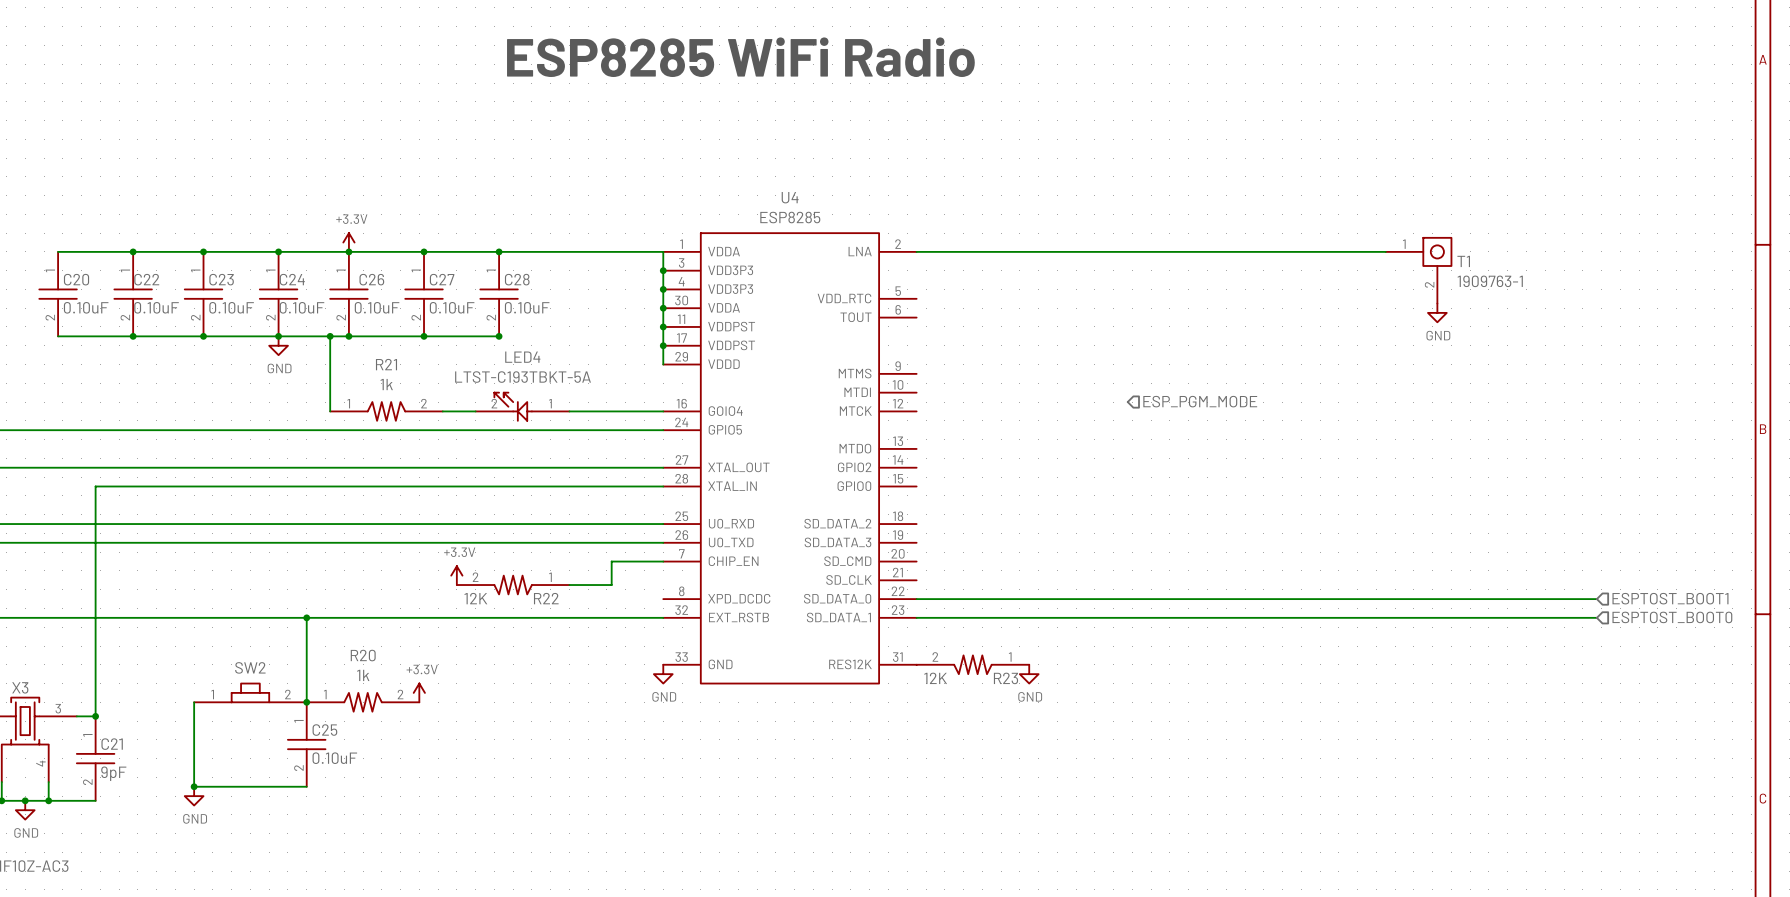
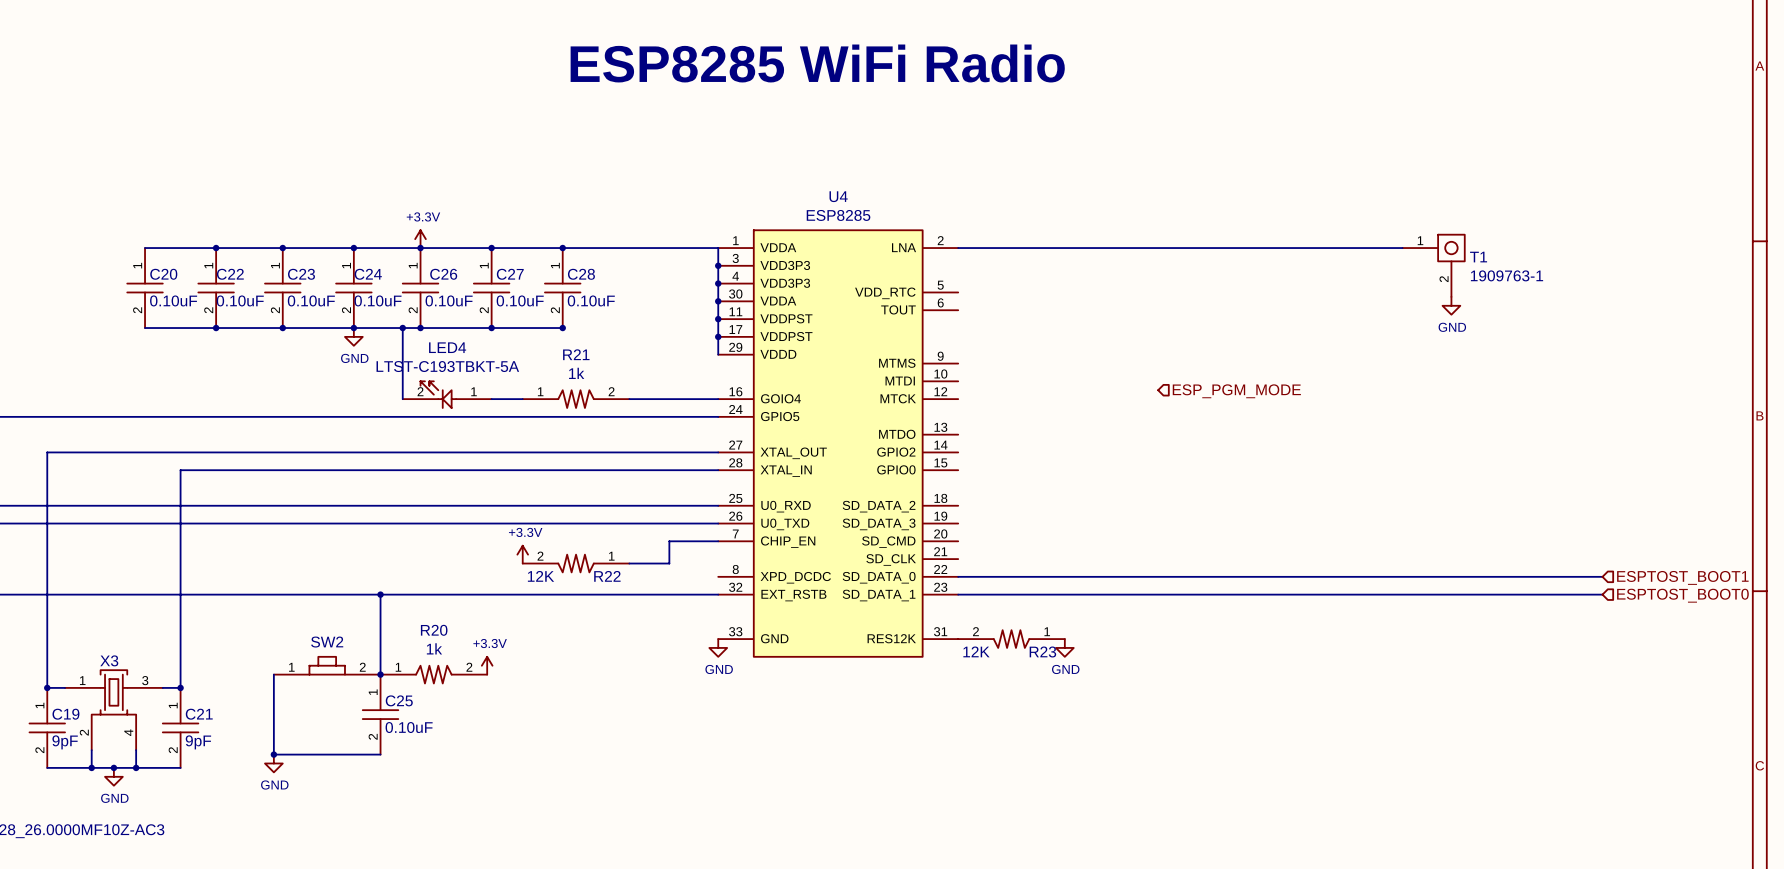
LED4 position: (522, 406) -> (447, 394)
R21 position: (386, 411) -> (576, 399)

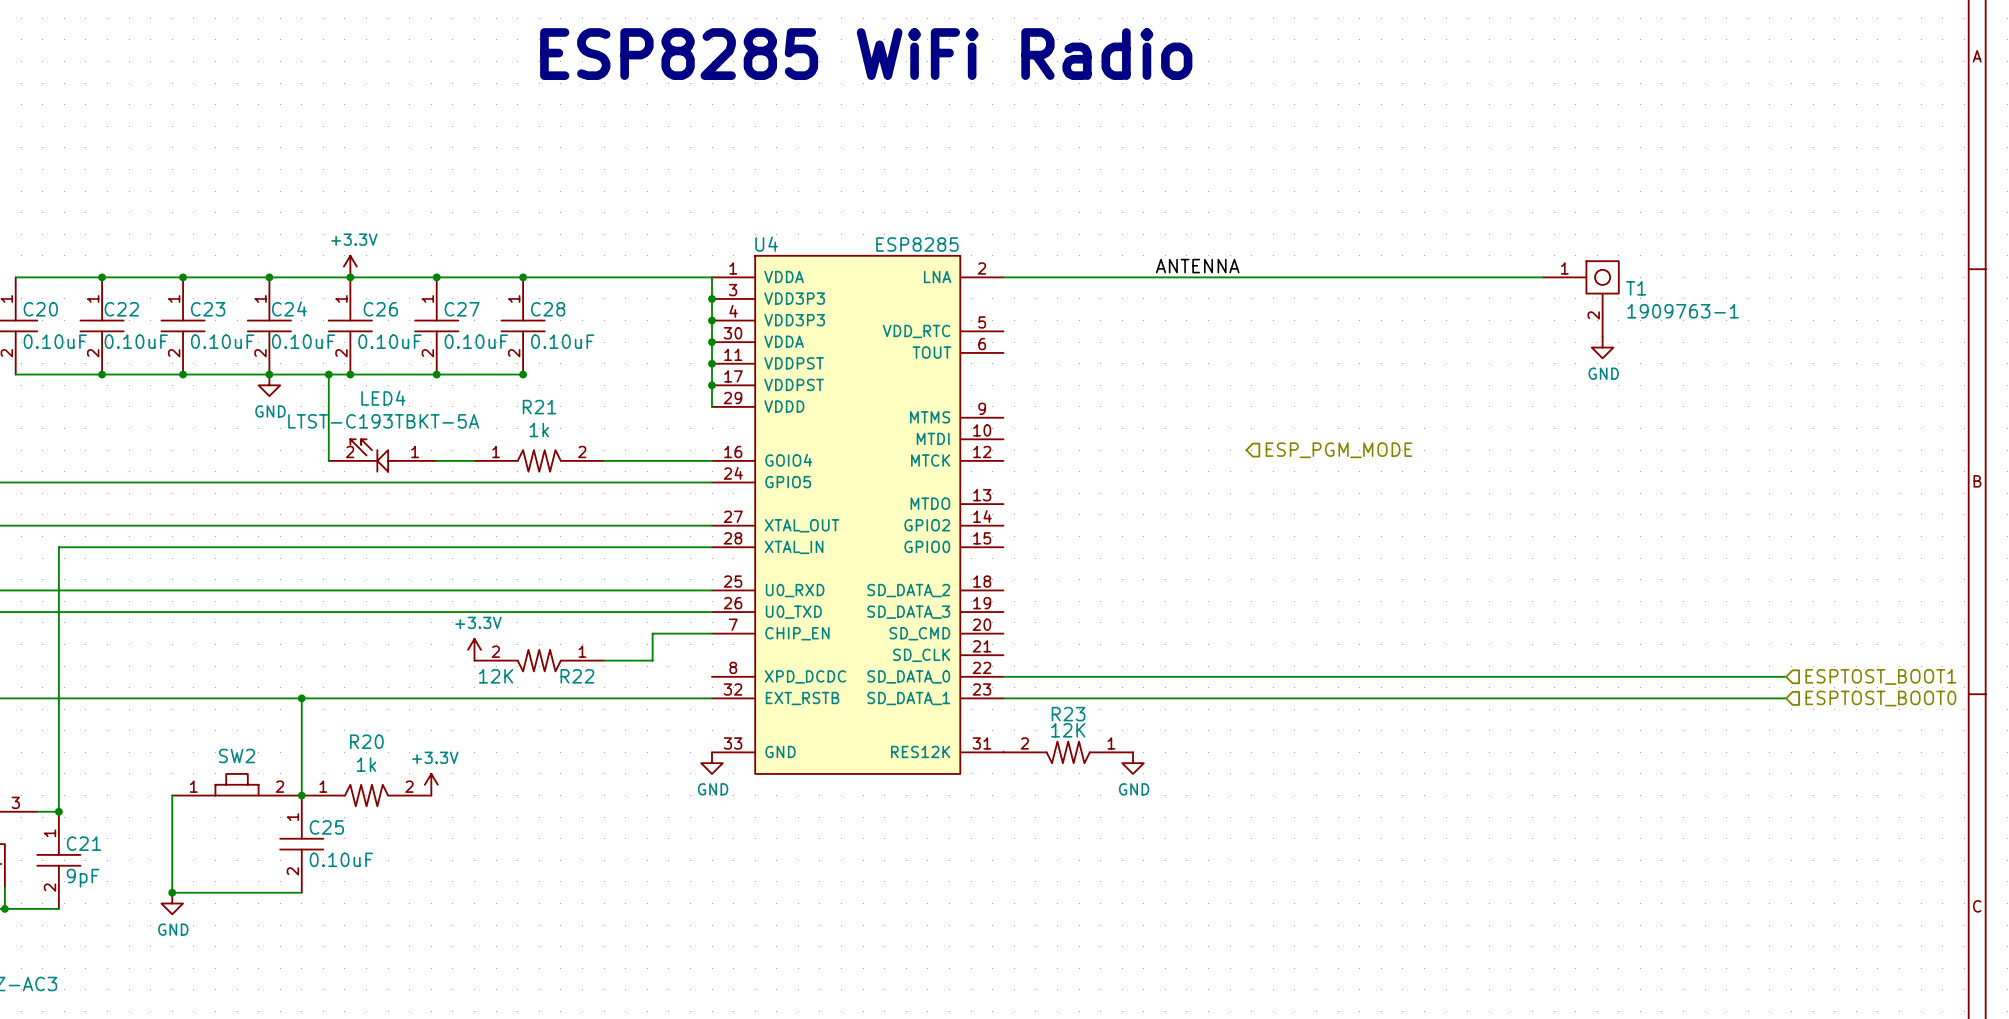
U4 name position: U4 (838, 196) -> U4 (766, 244)
U4 value position: ESP8285 (838, 215) -> ESP8285 (917, 244)
label: none -> ANTENNA (1197, 266)
R23 text position: 12K (976, 651) -> 12K (1068, 730)
R23 name position: R23 (1042, 651) -> R23 (1068, 714)

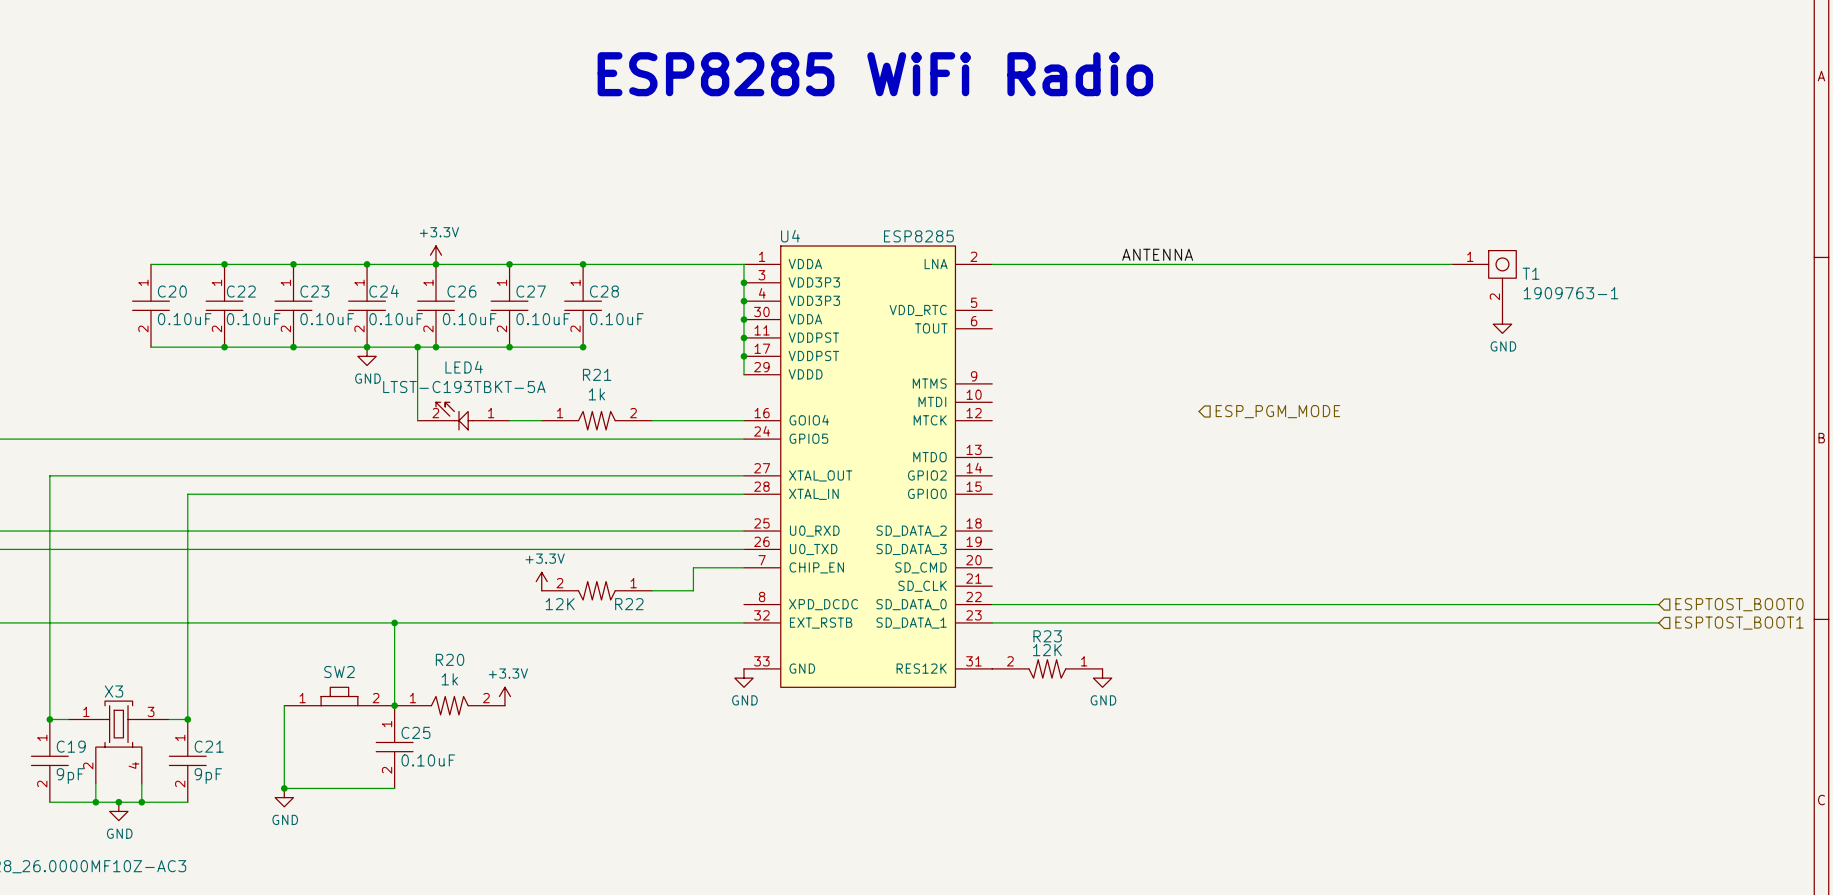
hierarchical label: ESPTOST_BOOT1 (1880, 676) -> ESPTOST_BOOT0 (1739, 604)
hierarchical label: ESPTOST_BOOT0 (1880, 698) -> ESPTOST_BOOT1 (1739, 623)

